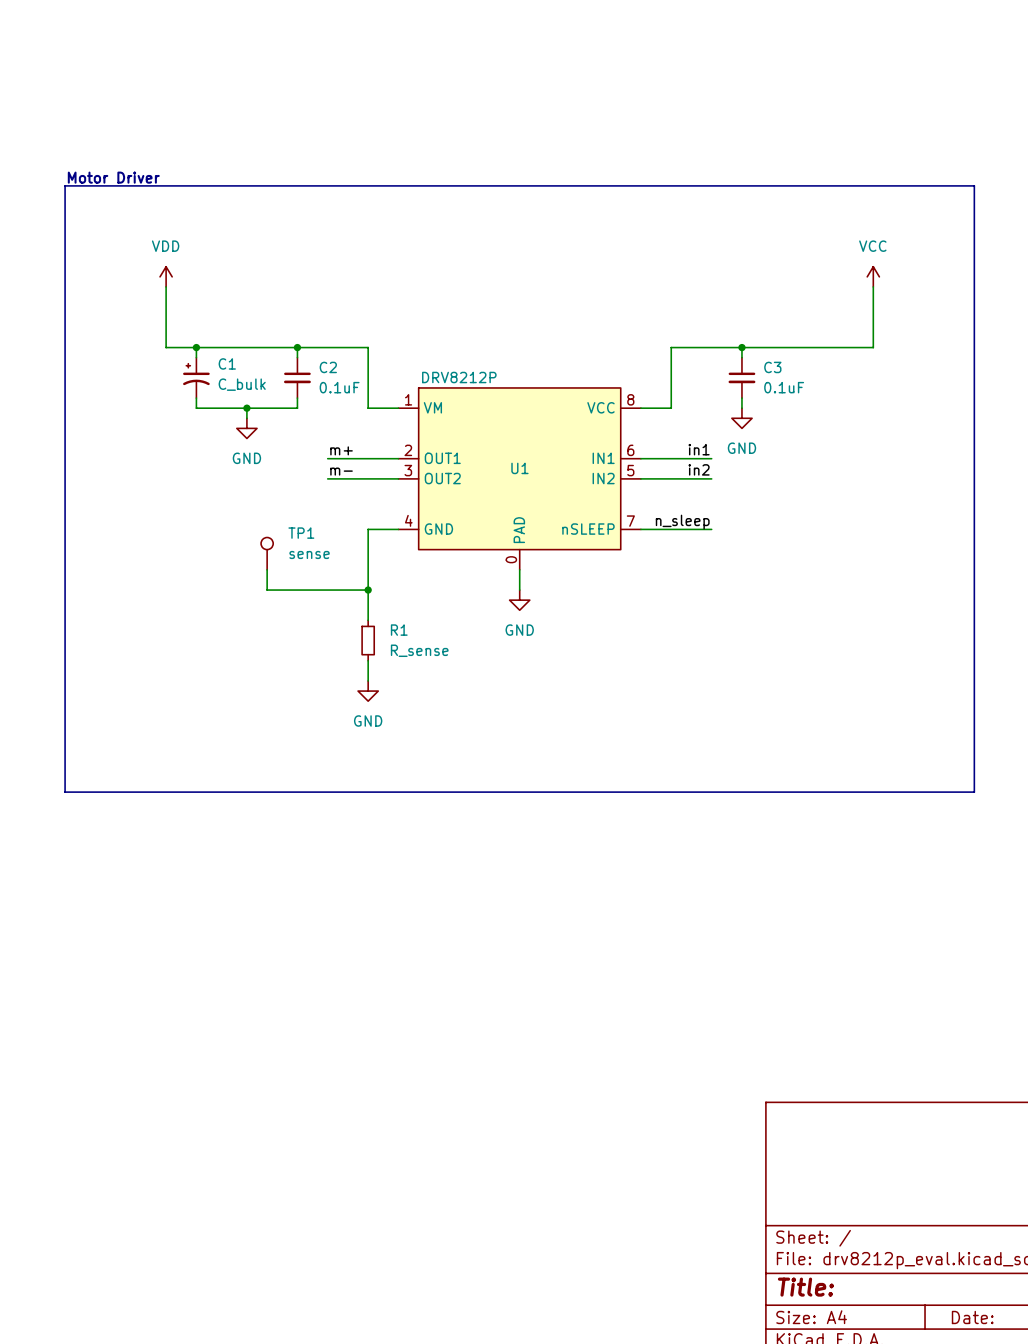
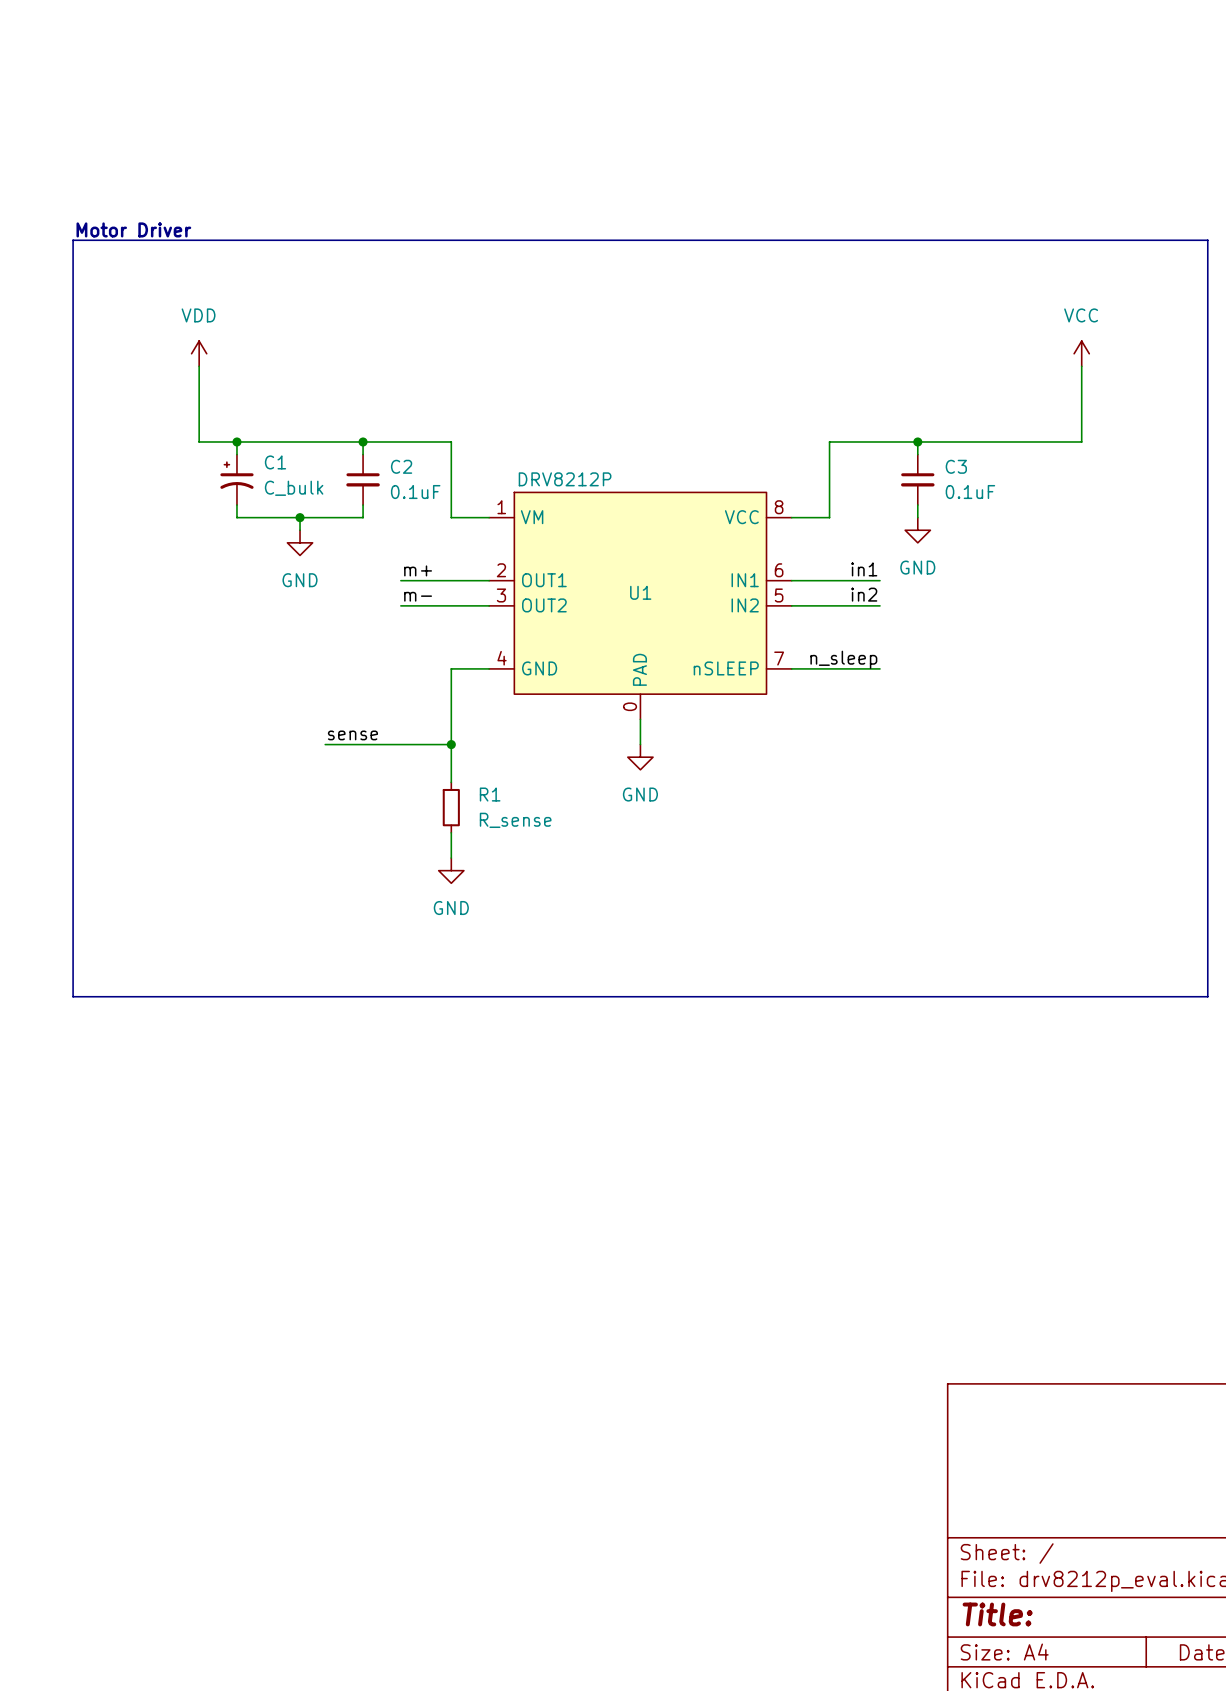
TP1: sense (267, 553) -> none
wire: (267, 569) (267, 590) -> none
label: none -> sense (352, 735)

